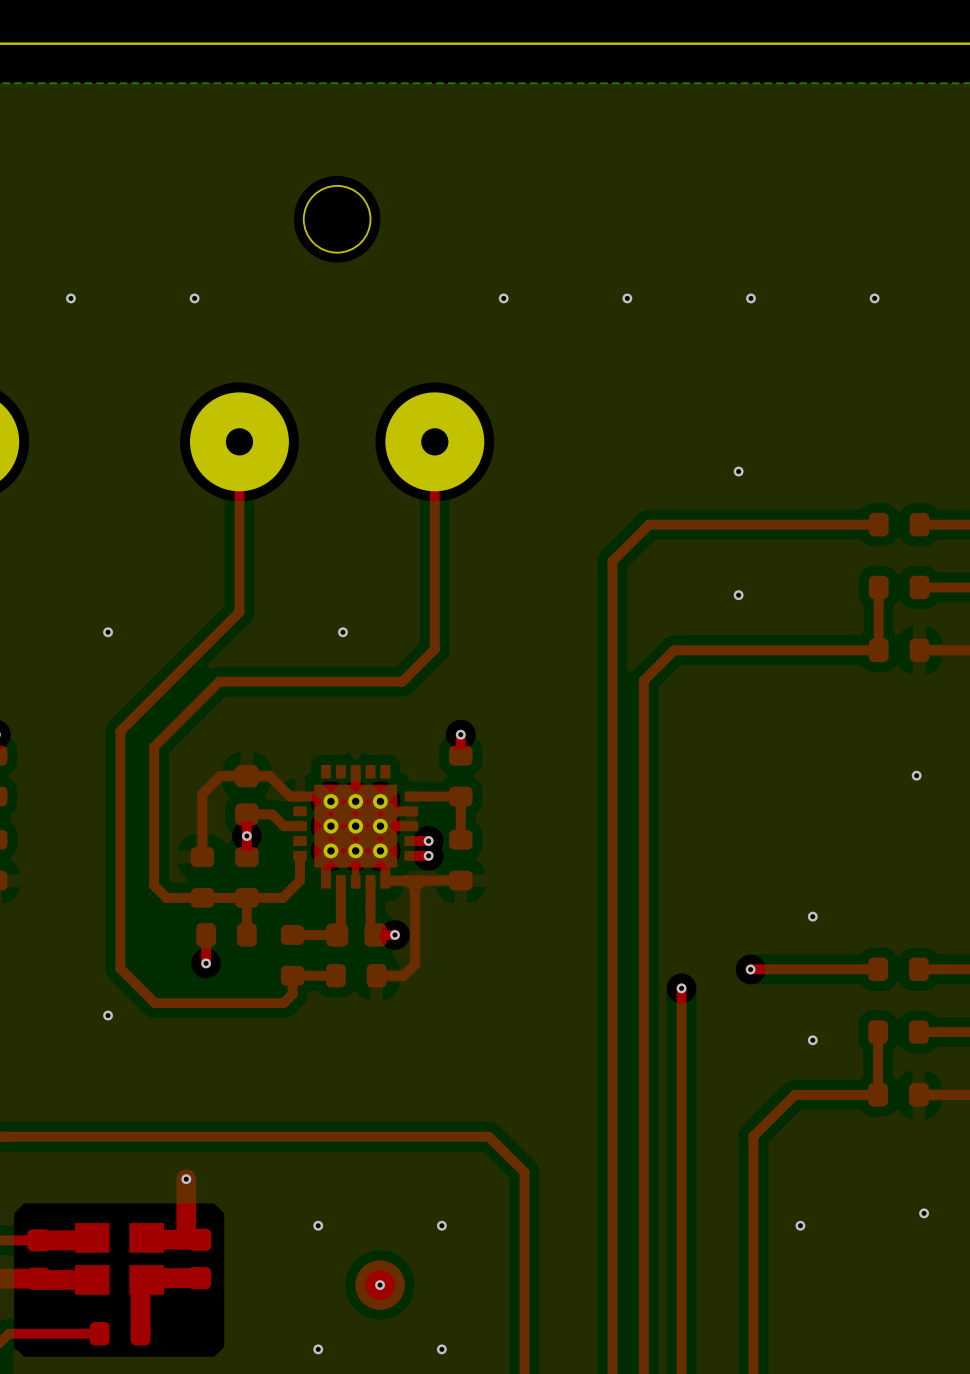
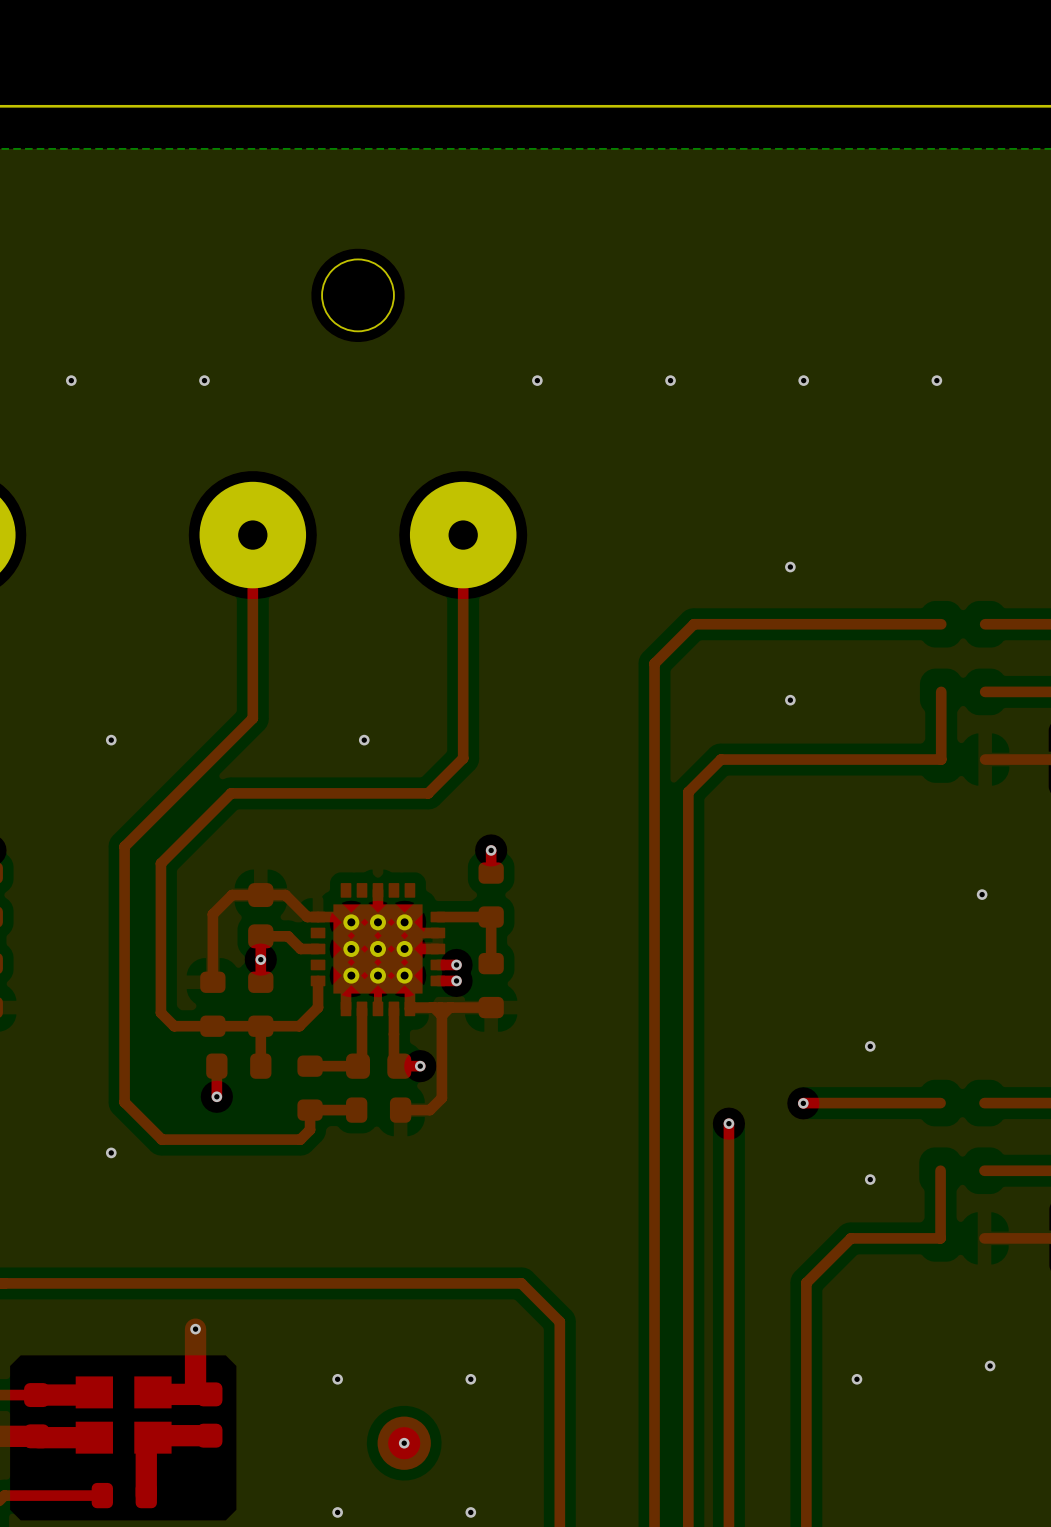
part: (899, 524) -> none
part: (899, 587) -> none
part: (899, 650) -> none
part: (898, 969) -> none
part: (898, 1032) -> none
part: (898, 1094) -> none

